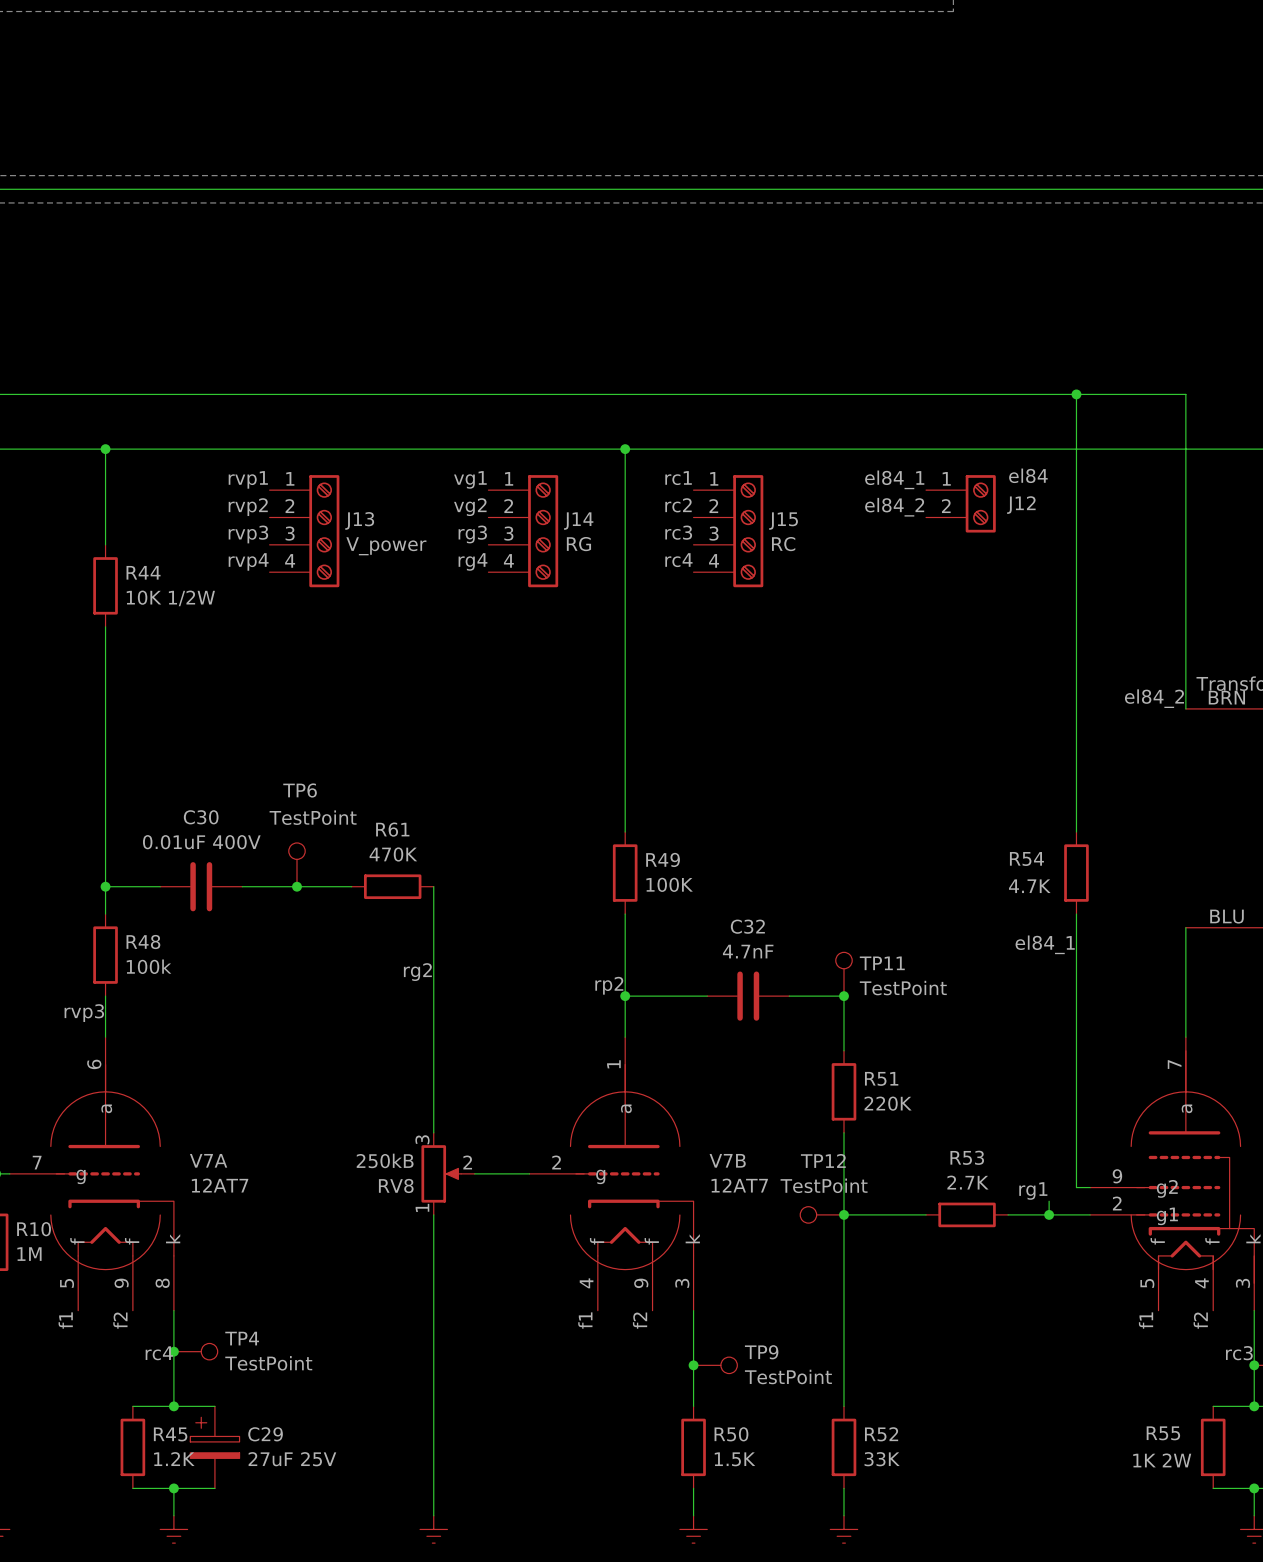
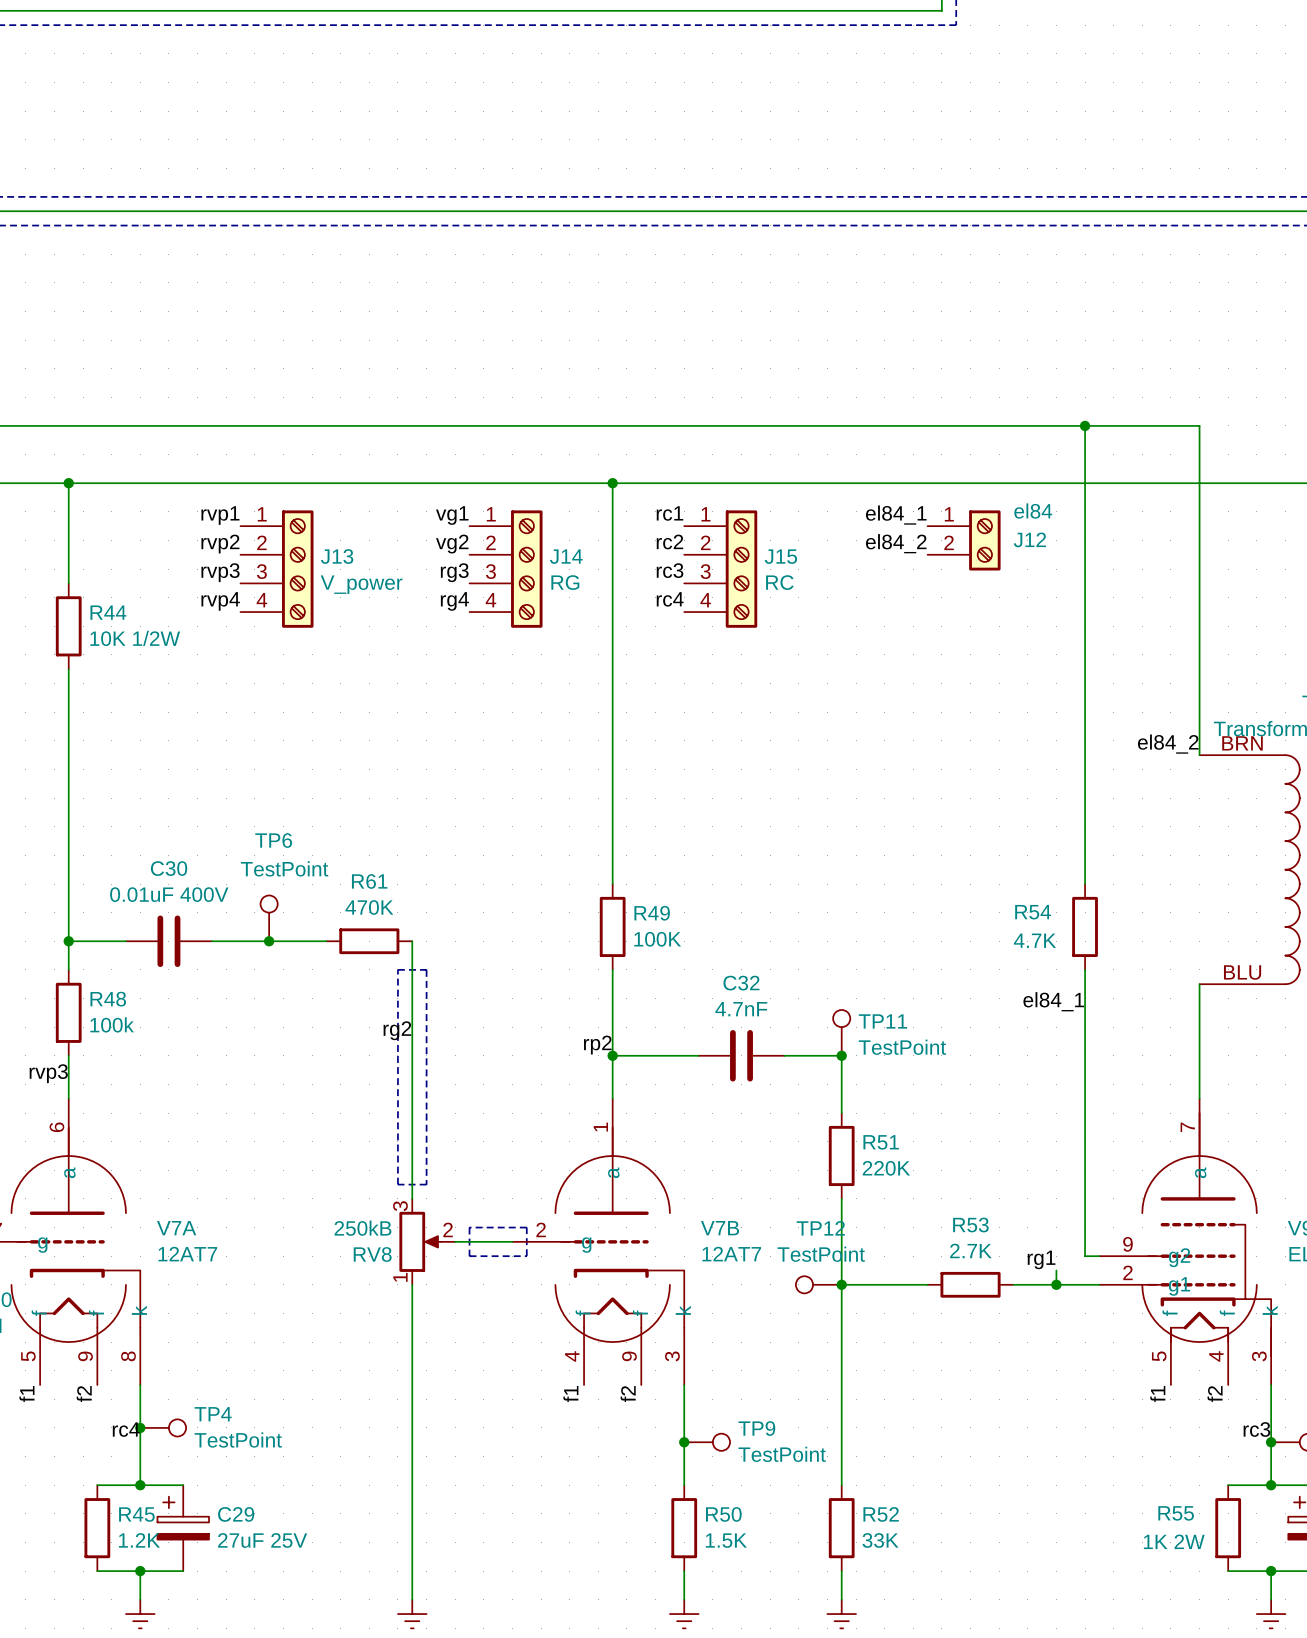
line: none -> (397, 969) (426, 969) (426, 1184) (397, 1184) (397, 969)
line: none -> (469, 1227) (469, 1256) (526, 1256) (526, 1227) (469, 1227)

